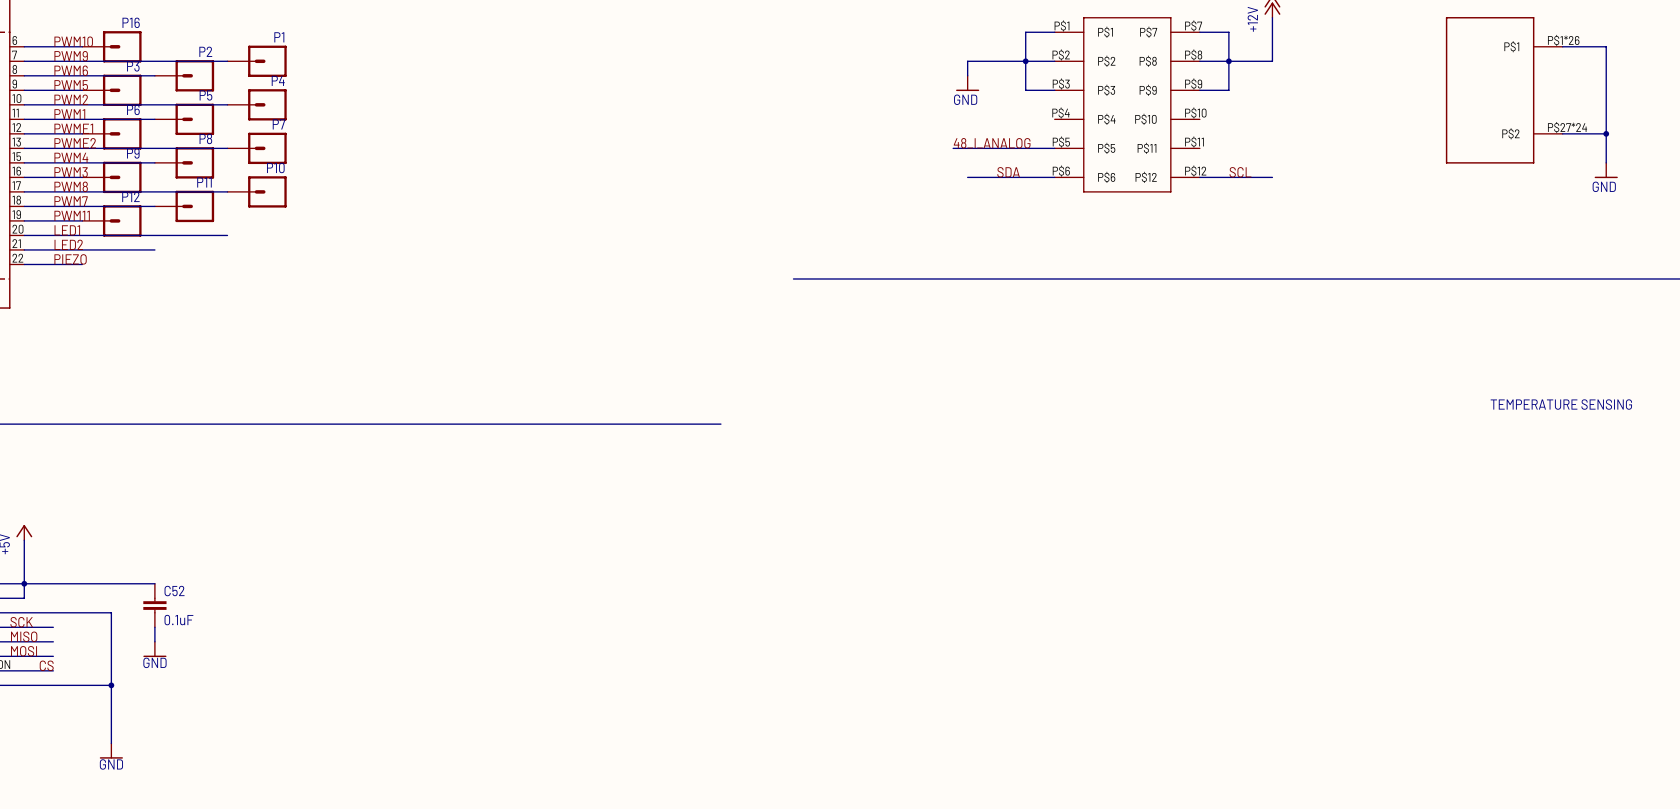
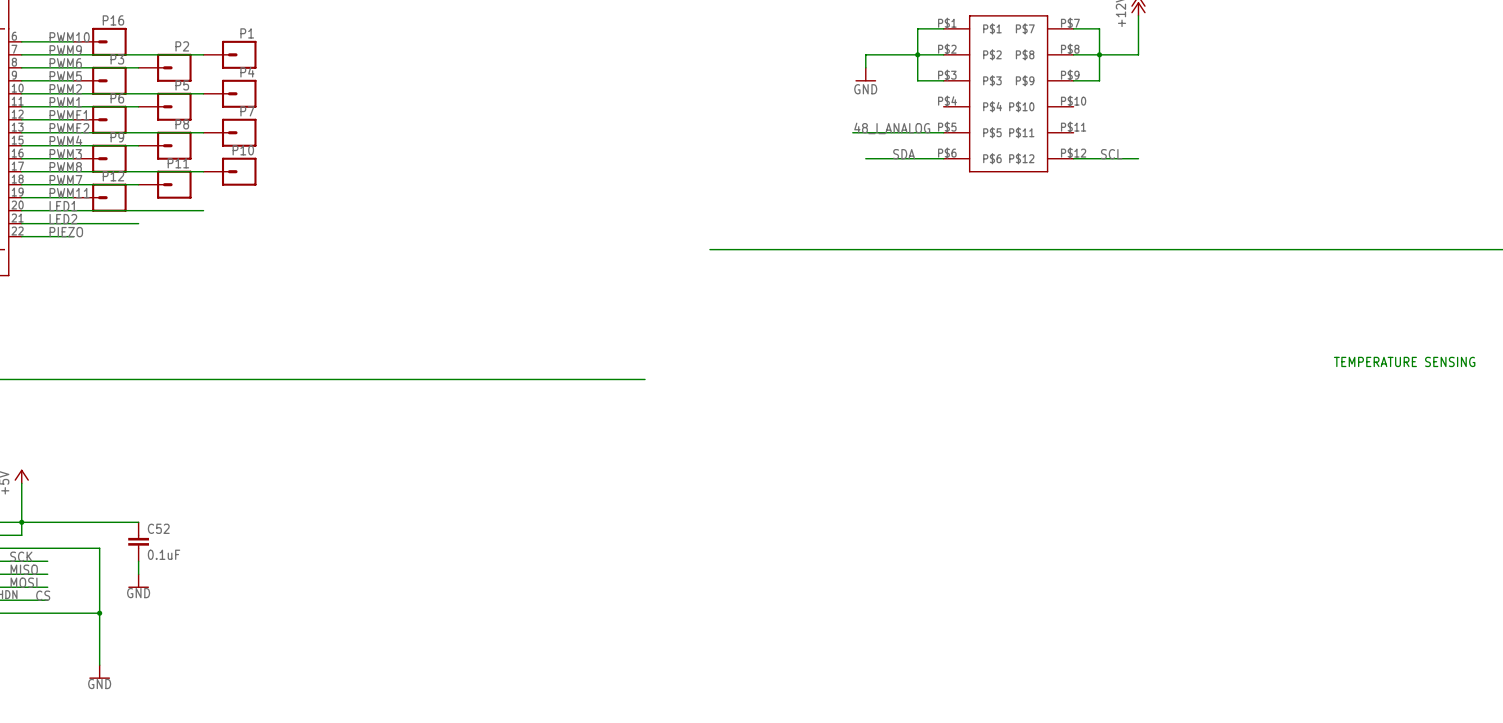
wire: (1562, 46) (1606, 46) (1606, 162) -> none
part: (1504, 90) -> none
wire: (1562, 133) (1606, 133) -> none
junction: (1606, 133) -> none
power symbol: GND (1606, 170) -> none

